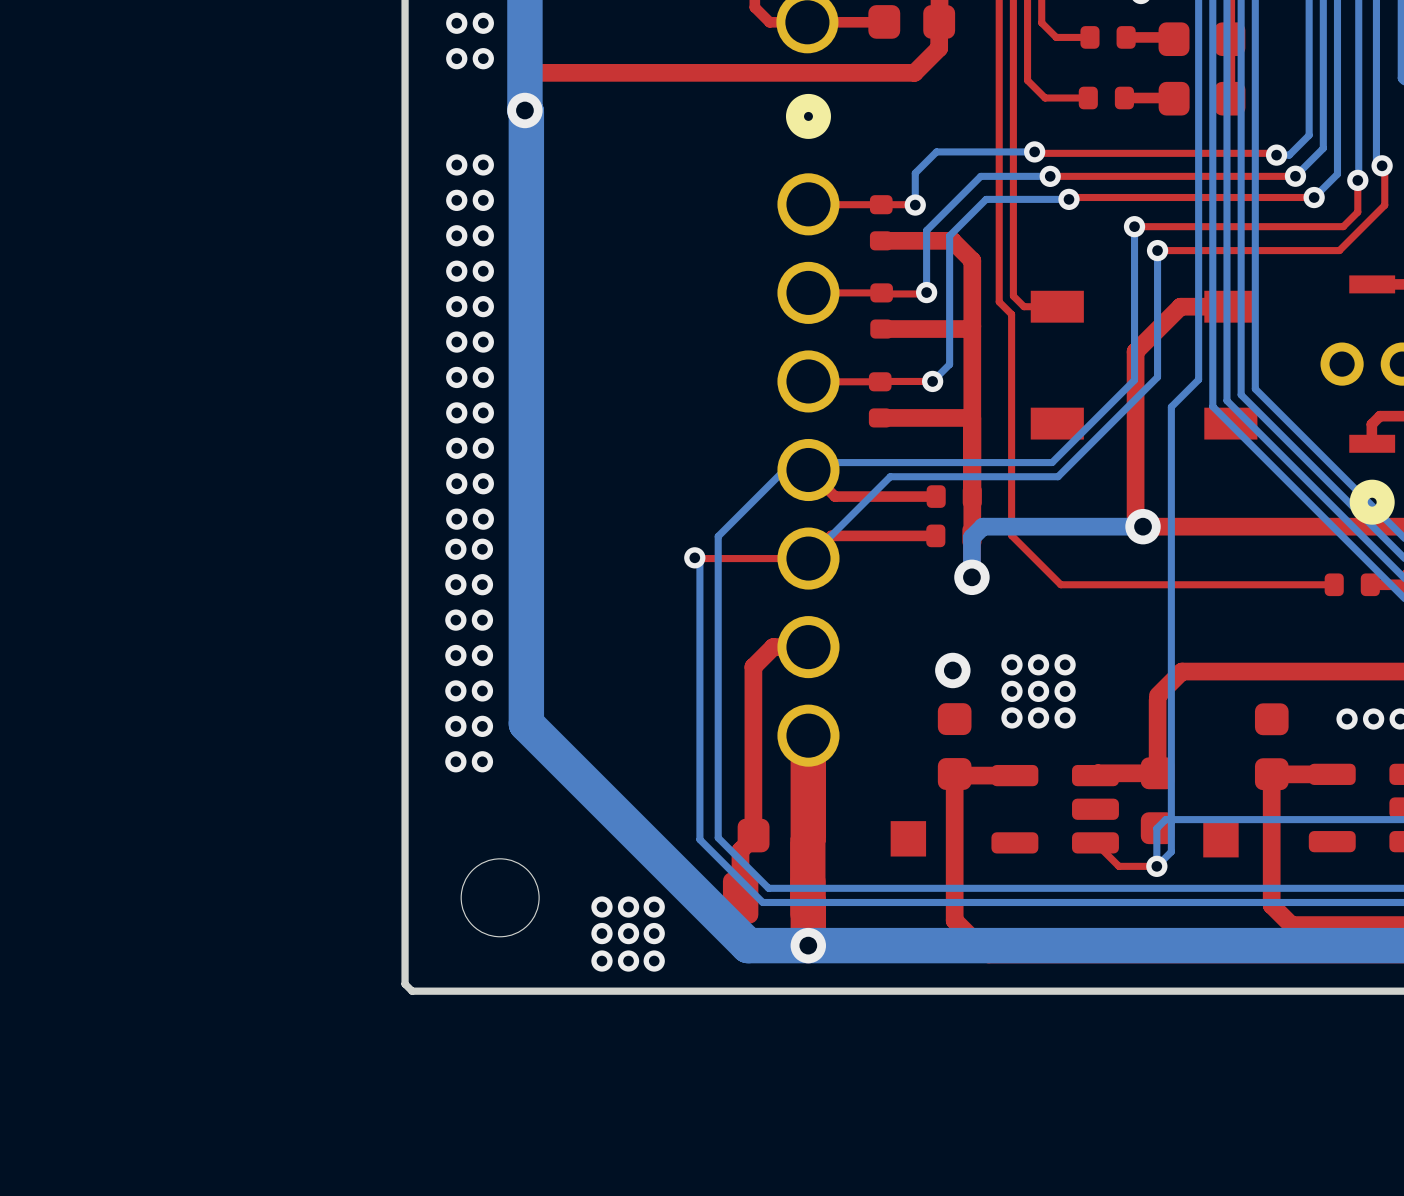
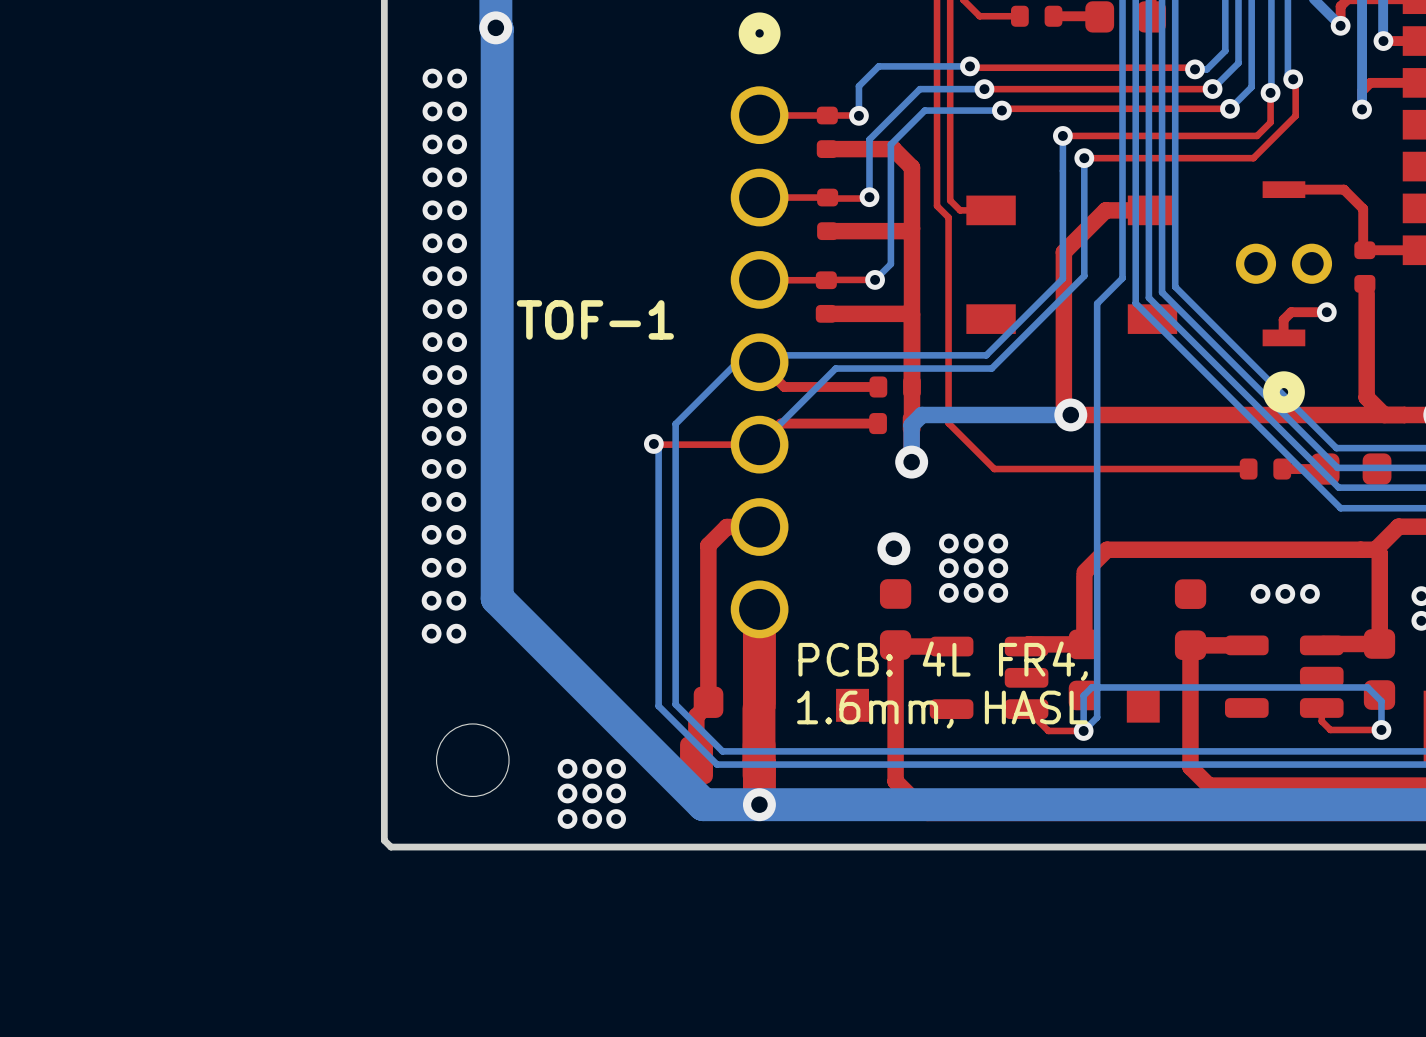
text: none -> TOF-1 (595, 319)
text: none -> PCB: 4L FR4, (943, 661)
text: none -> 1.6mm, HASL (942, 709)

